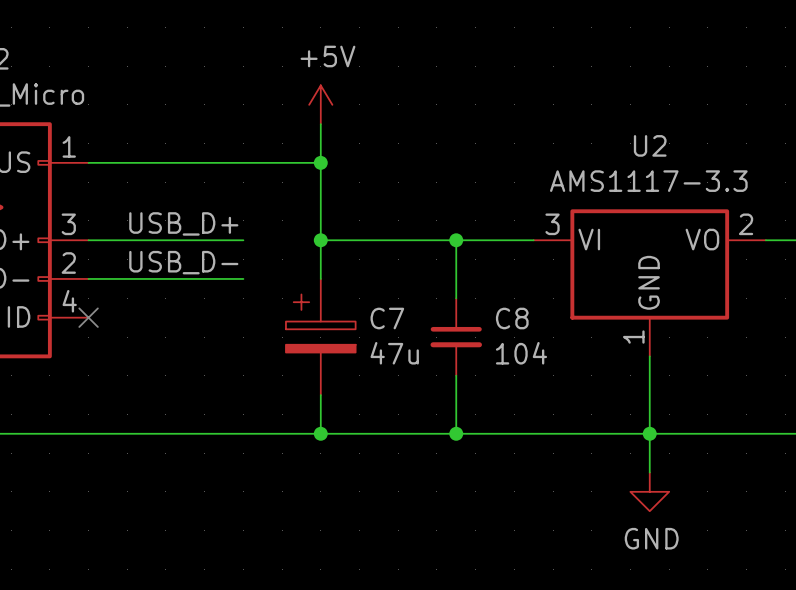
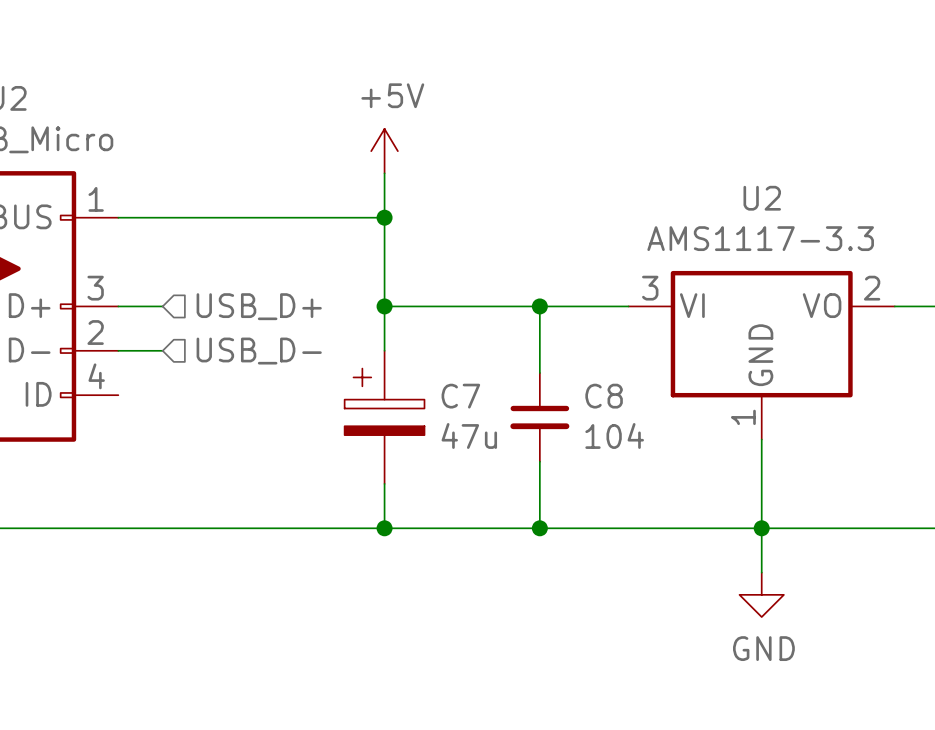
label: USB_D+ (183, 223) -> none
wire: (127, 240) (243, 240) -> none
hierarchical label: none -> USB_D+ (259, 306)
label: USB_D- (183, 262) -> none
wire: (127, 278) (243, 278) -> none
hierarchical label: none -> USB_D- (259, 351)
no-connect mark: (88, 317) -> none

